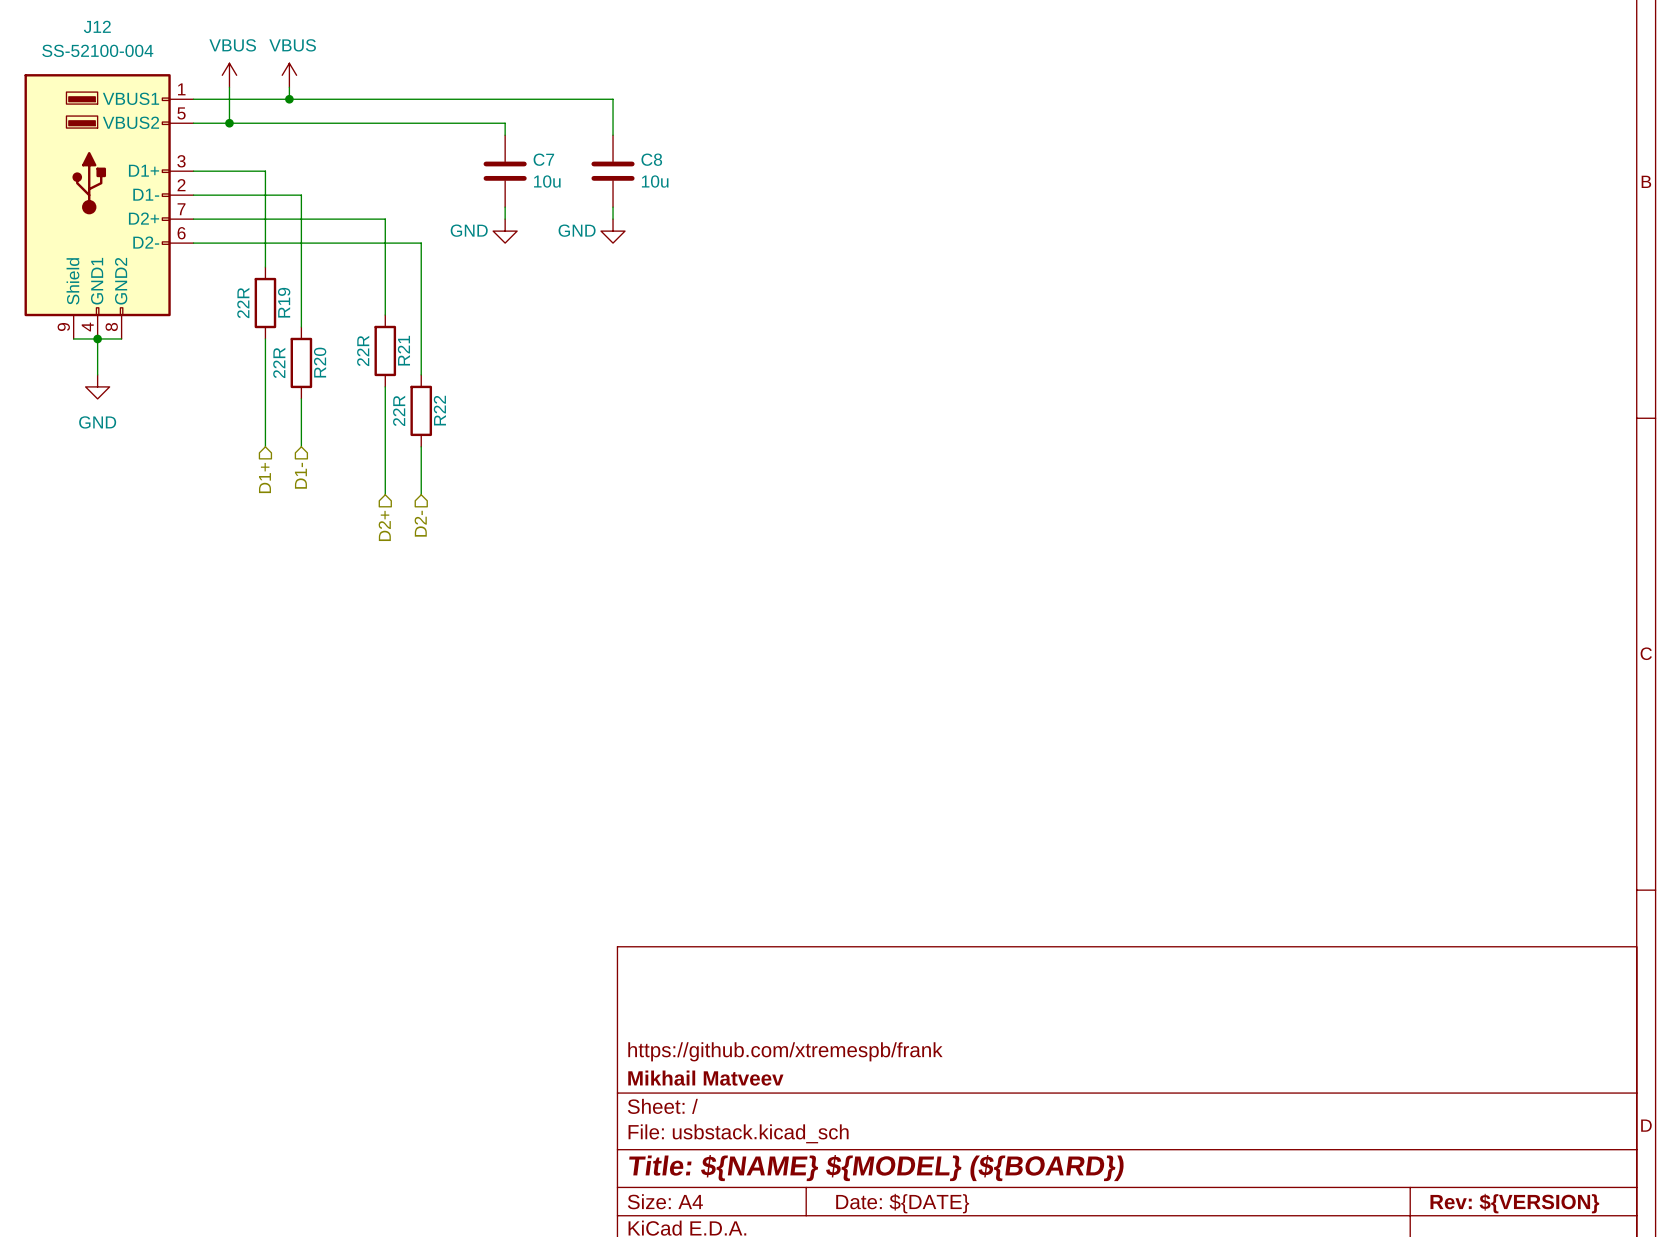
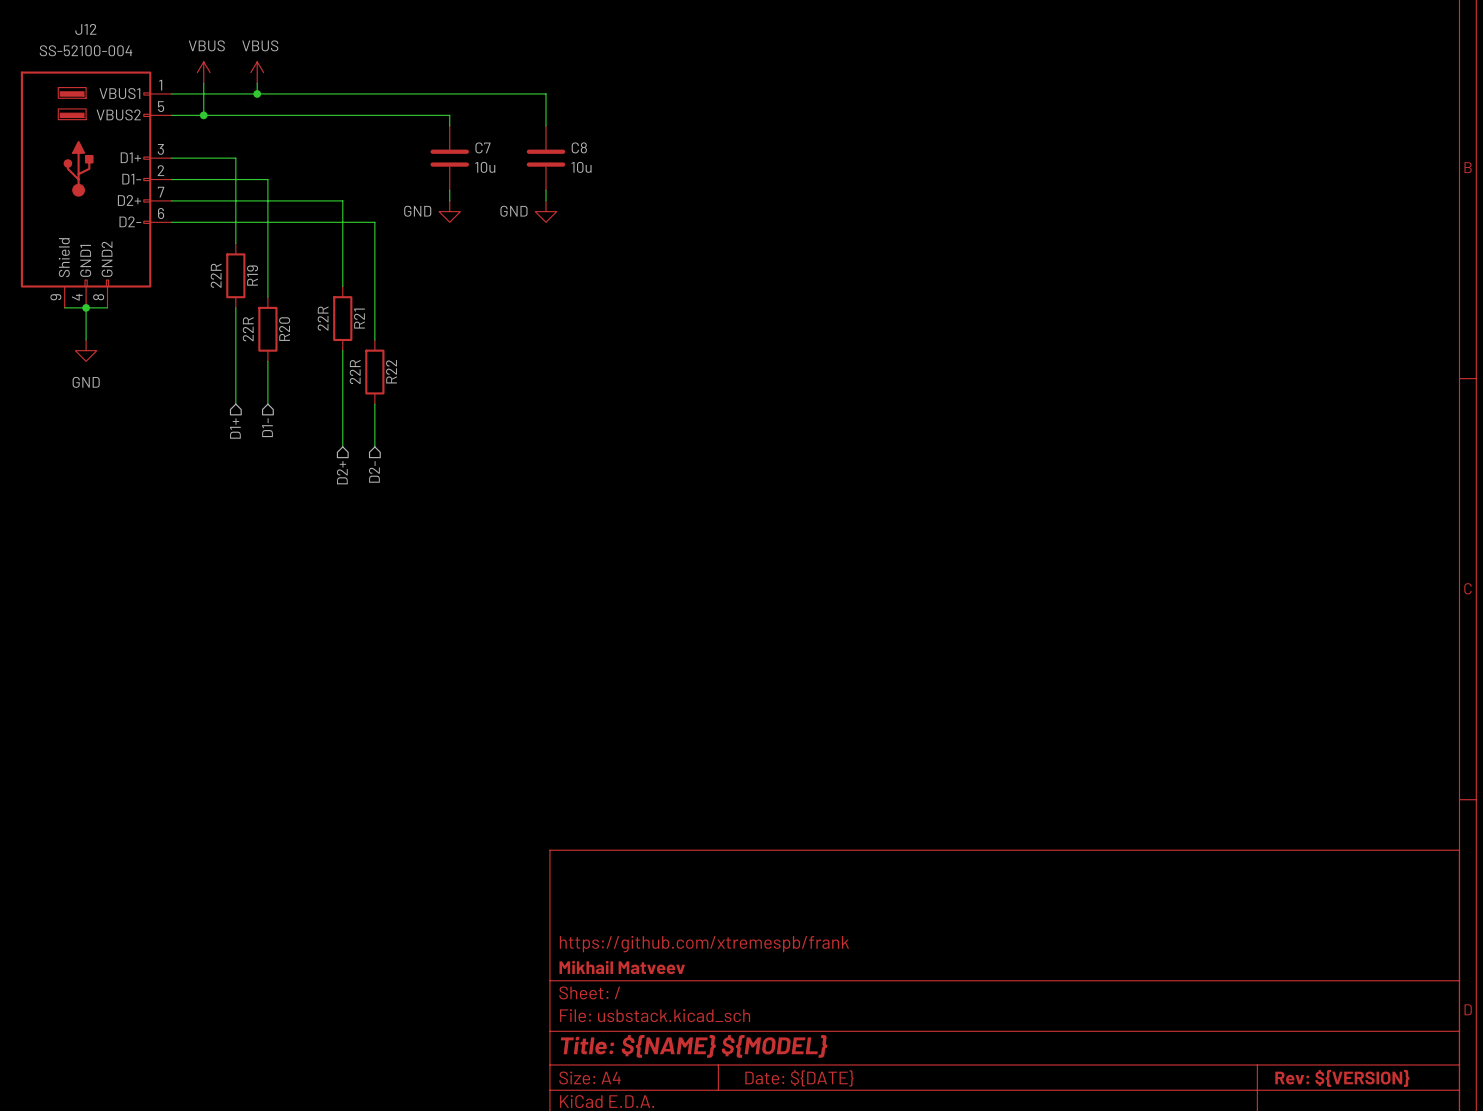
title block: Title: ${NAME} ${MODEL} (${BOARD}) (876, 1168) -> Title: ${NAME} ${MODEL} (694, 1046)

